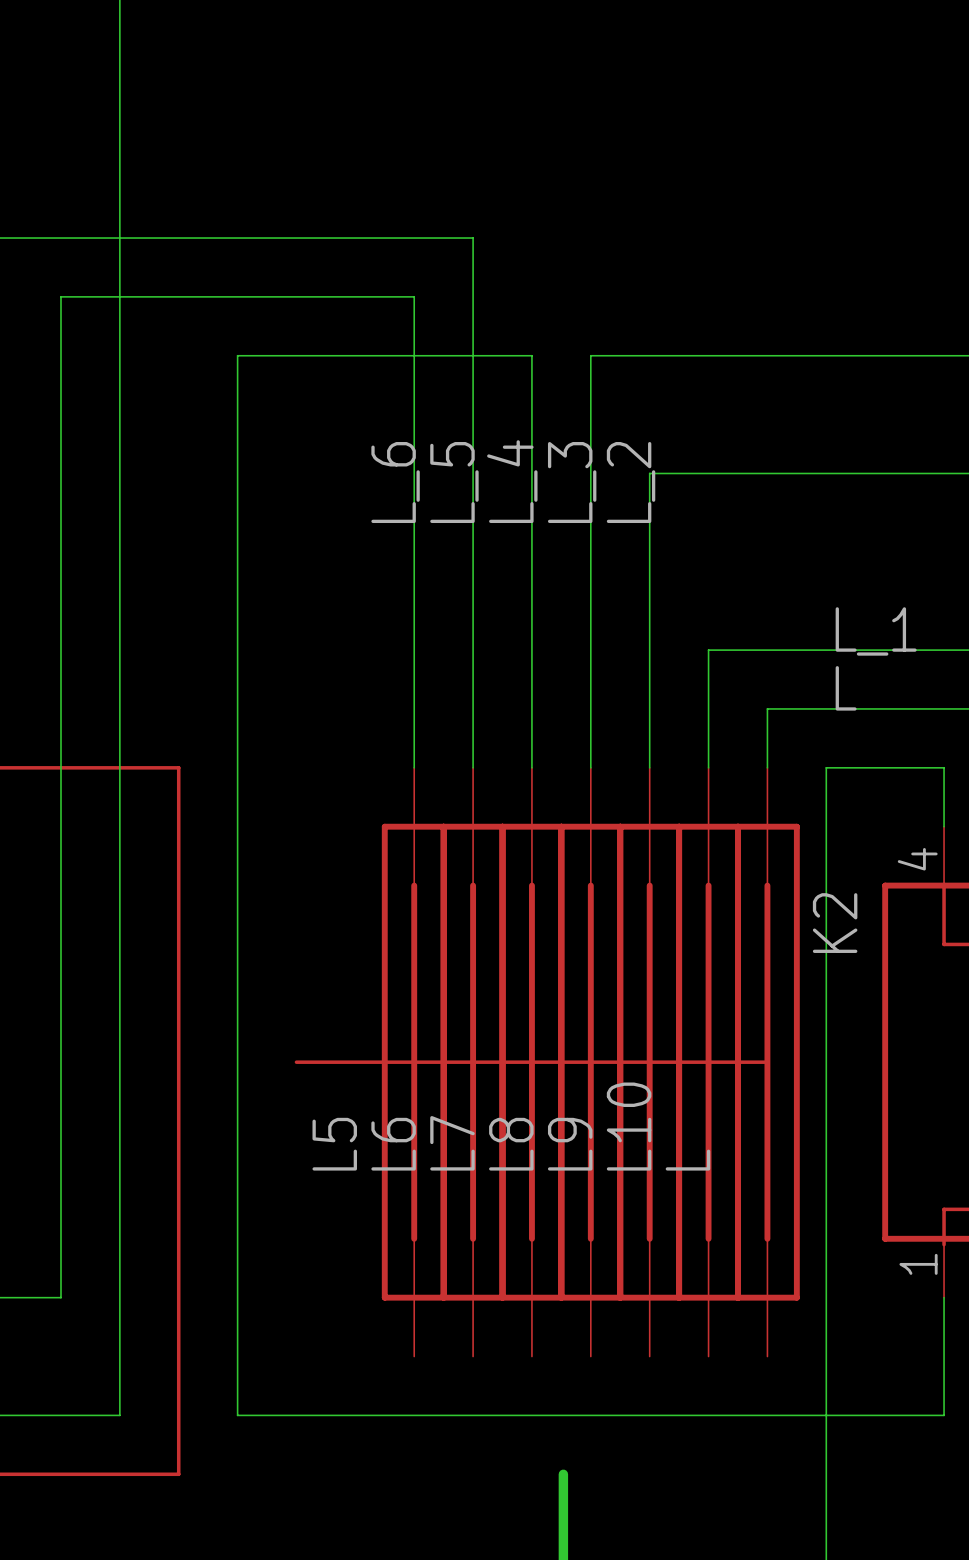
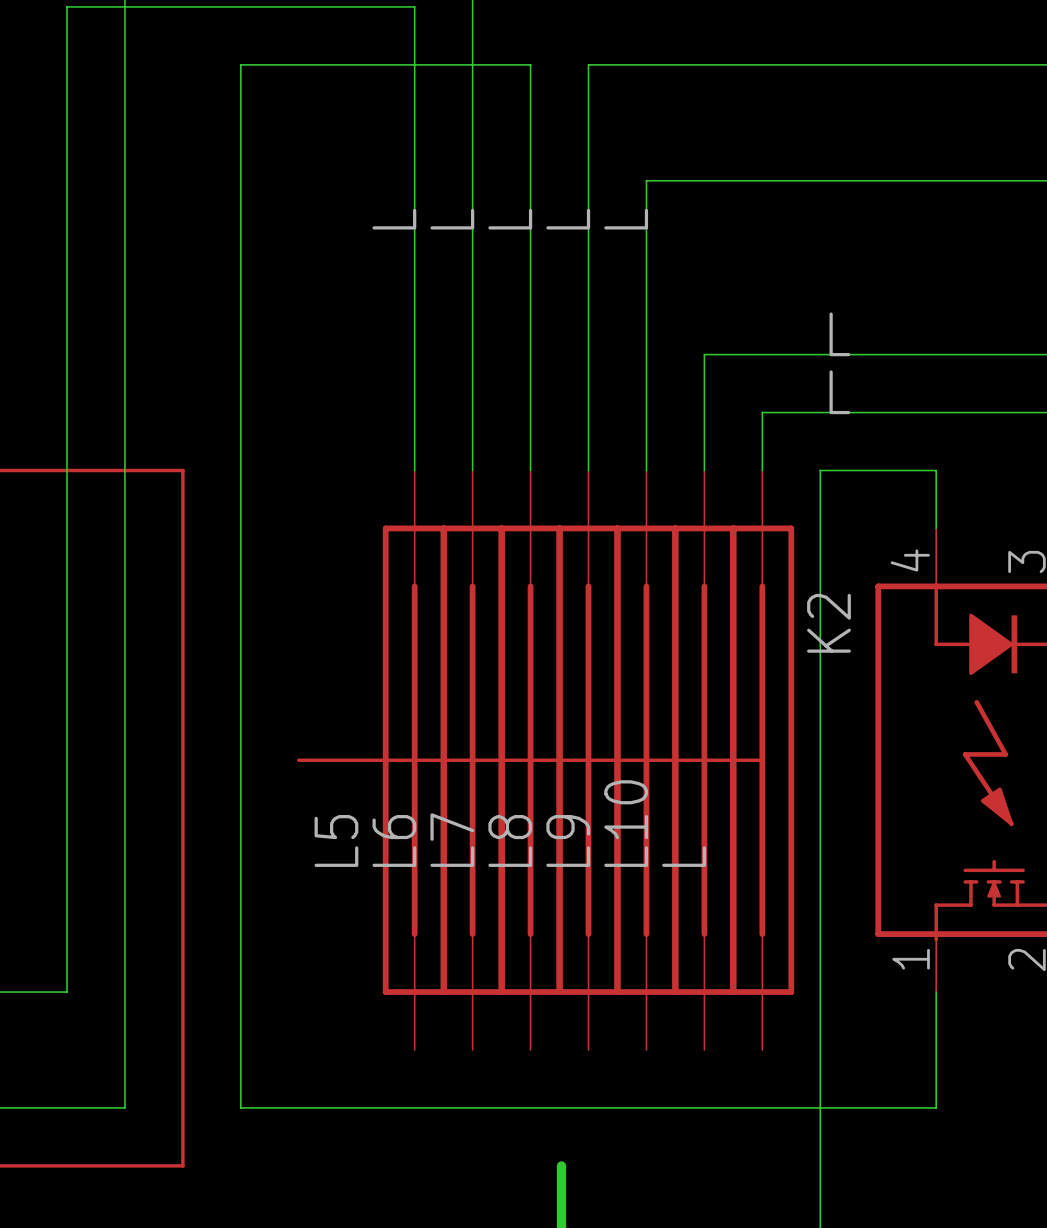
label: L_4 (512, 481) -> L (510, 219)
label: L_6 (395, 482) -> L (394, 219)
label: L_5 (454, 482) -> L (452, 219)
label: L_3 (572, 482) -> L (568, 219)
label: L_2 (631, 482) -> L (626, 219)
label: L_1 (876, 631) -> L (839, 334)

